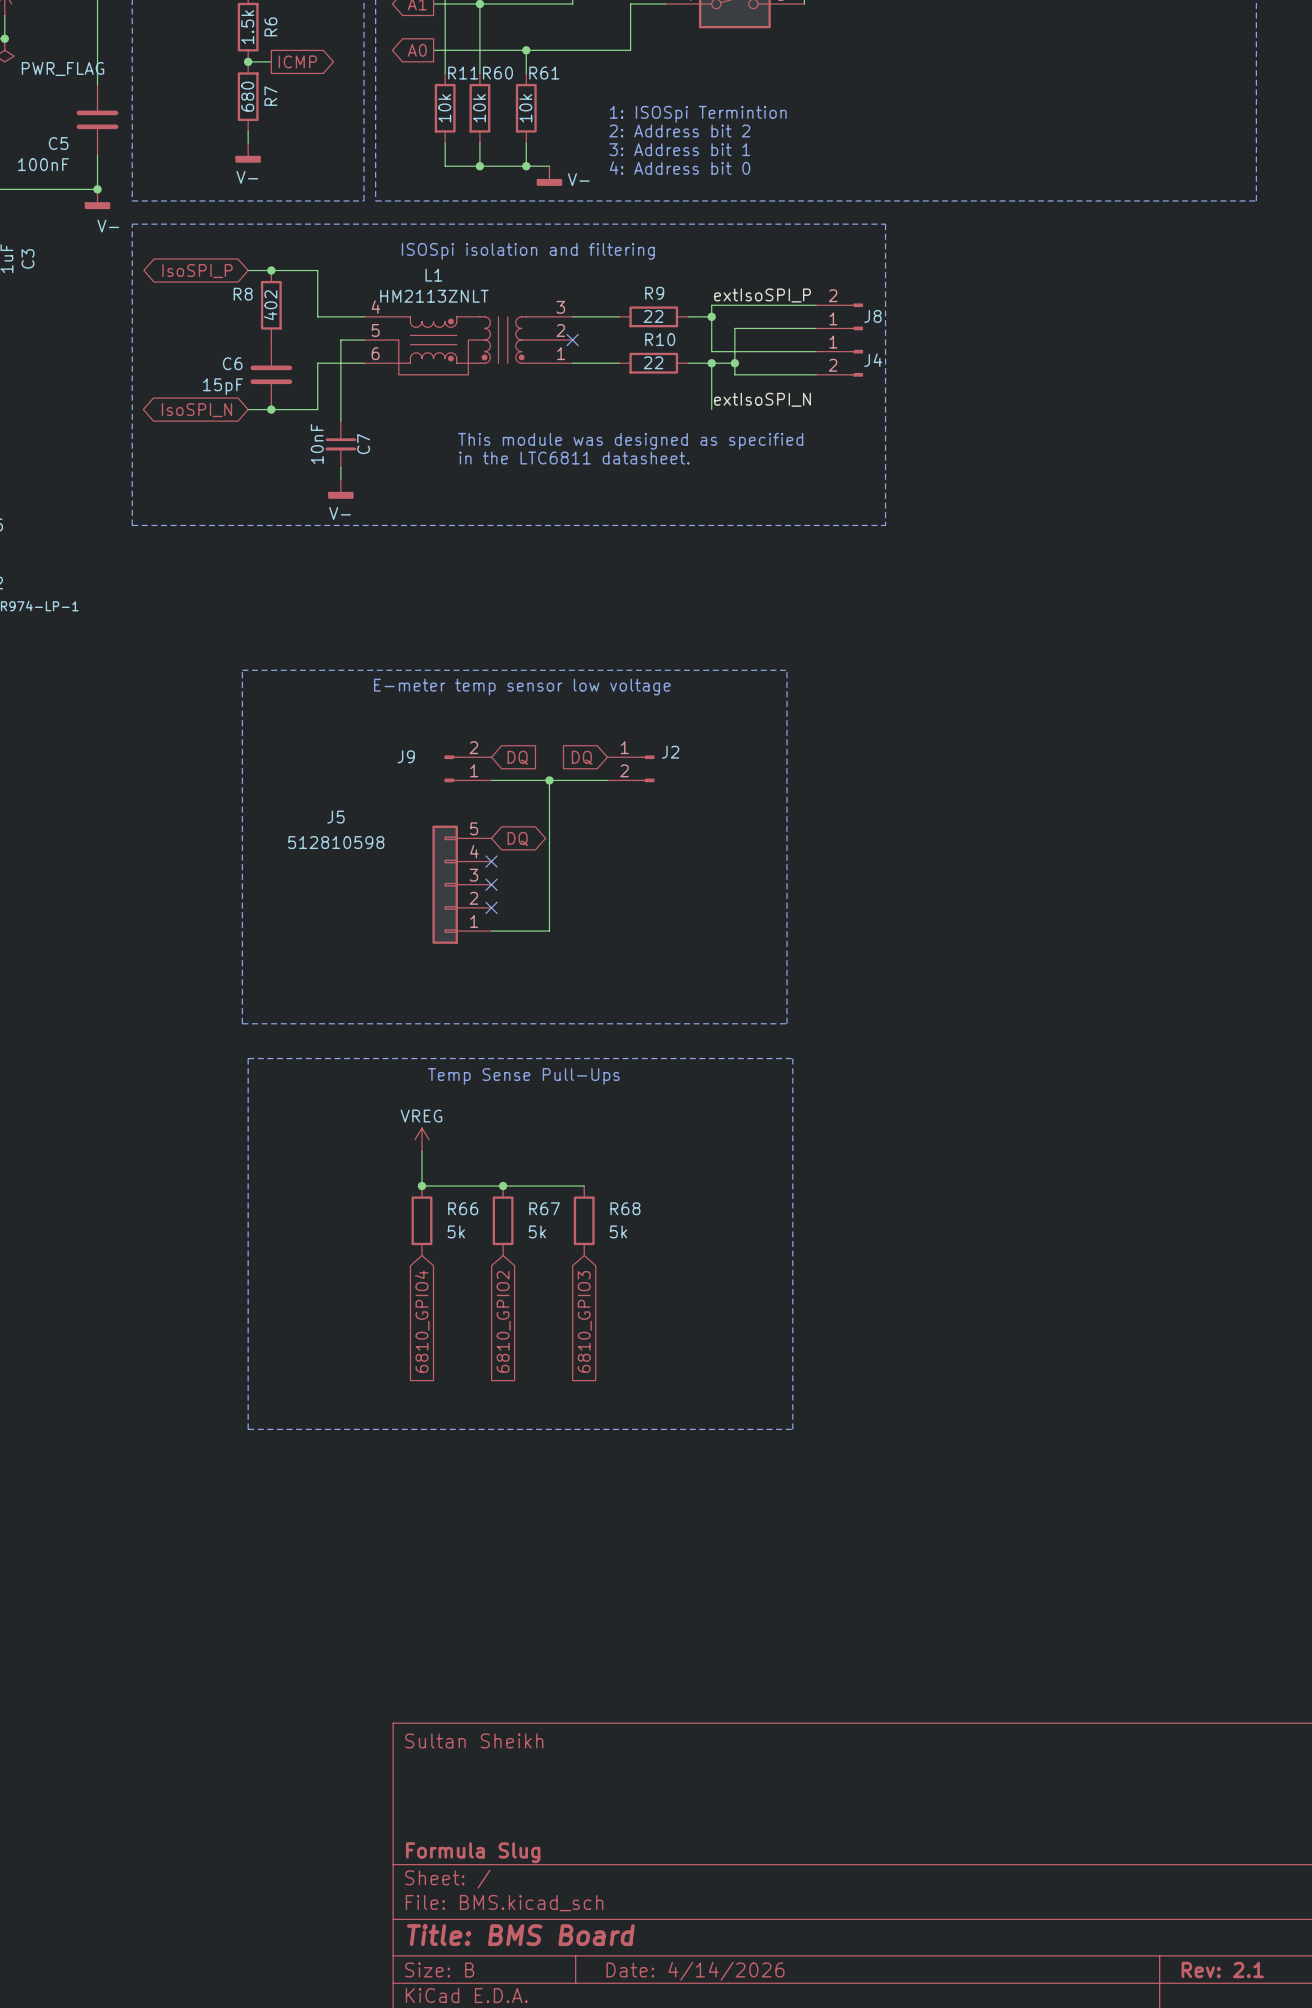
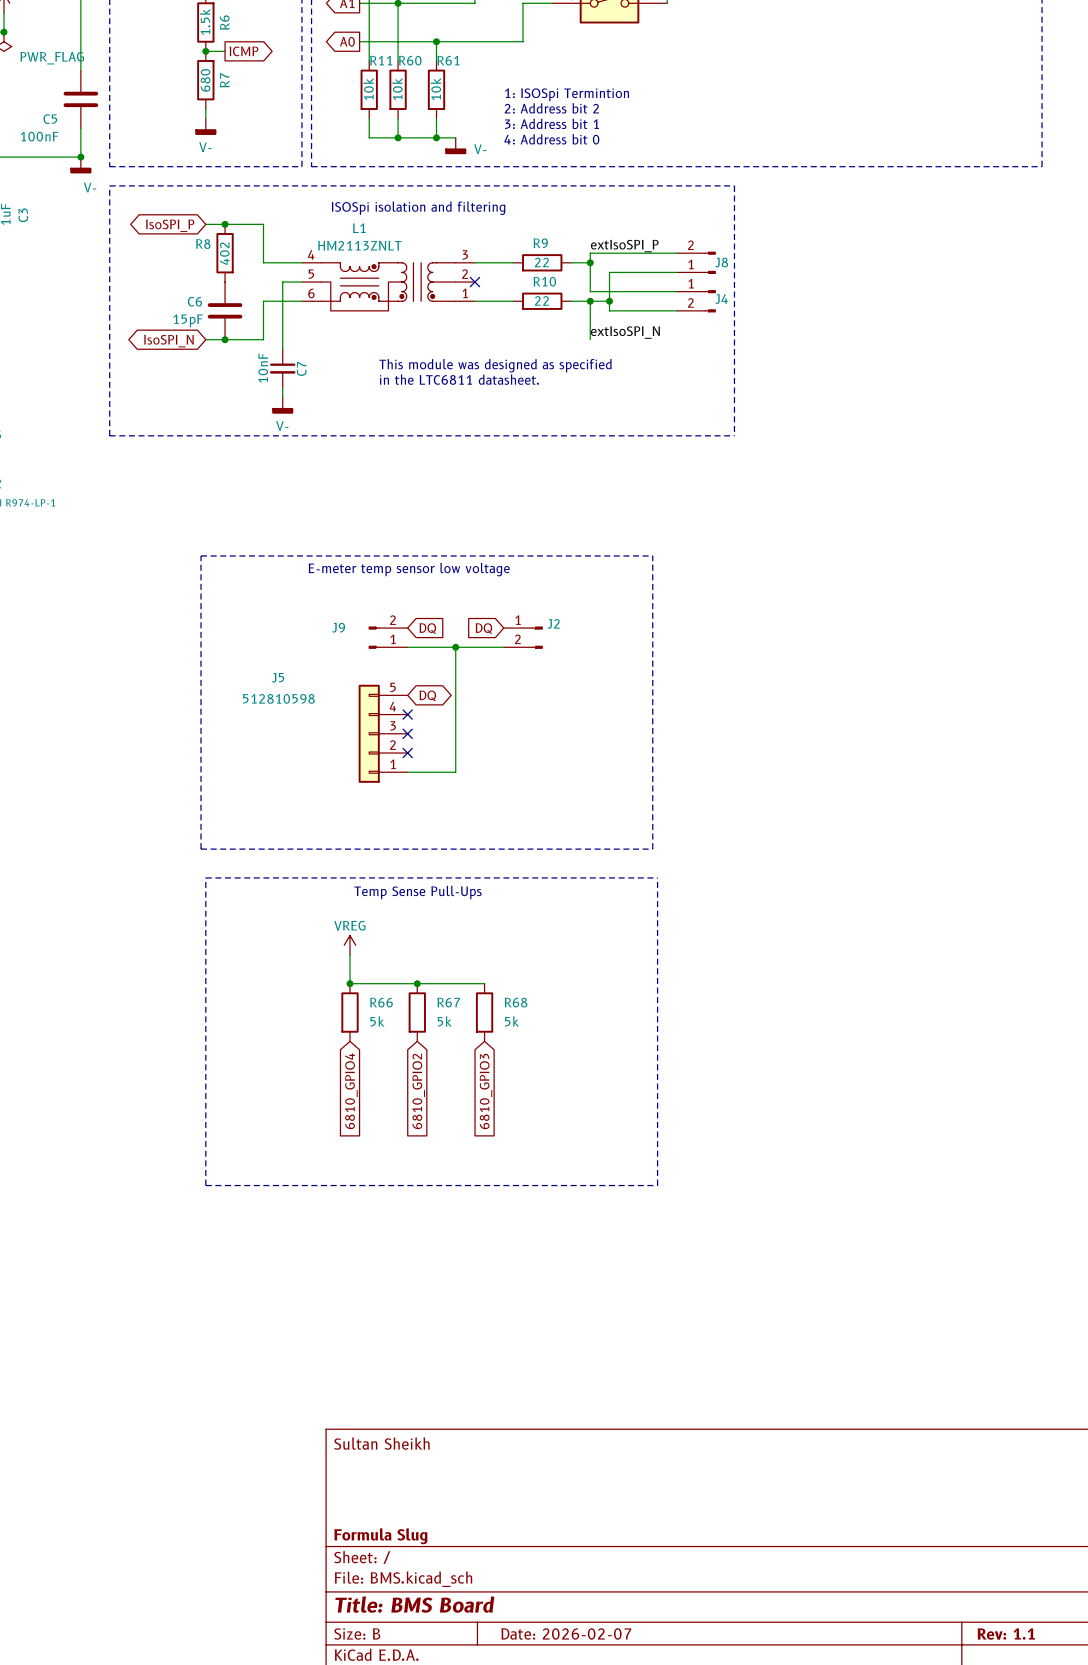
title block: Rev: 2.1 (1222, 1969) -> Rev: 1.1 (1006, 1634)
title block: Date: 4/14/2026 (695, 1971) -> Date: 2026-02-07 (566, 1633)

